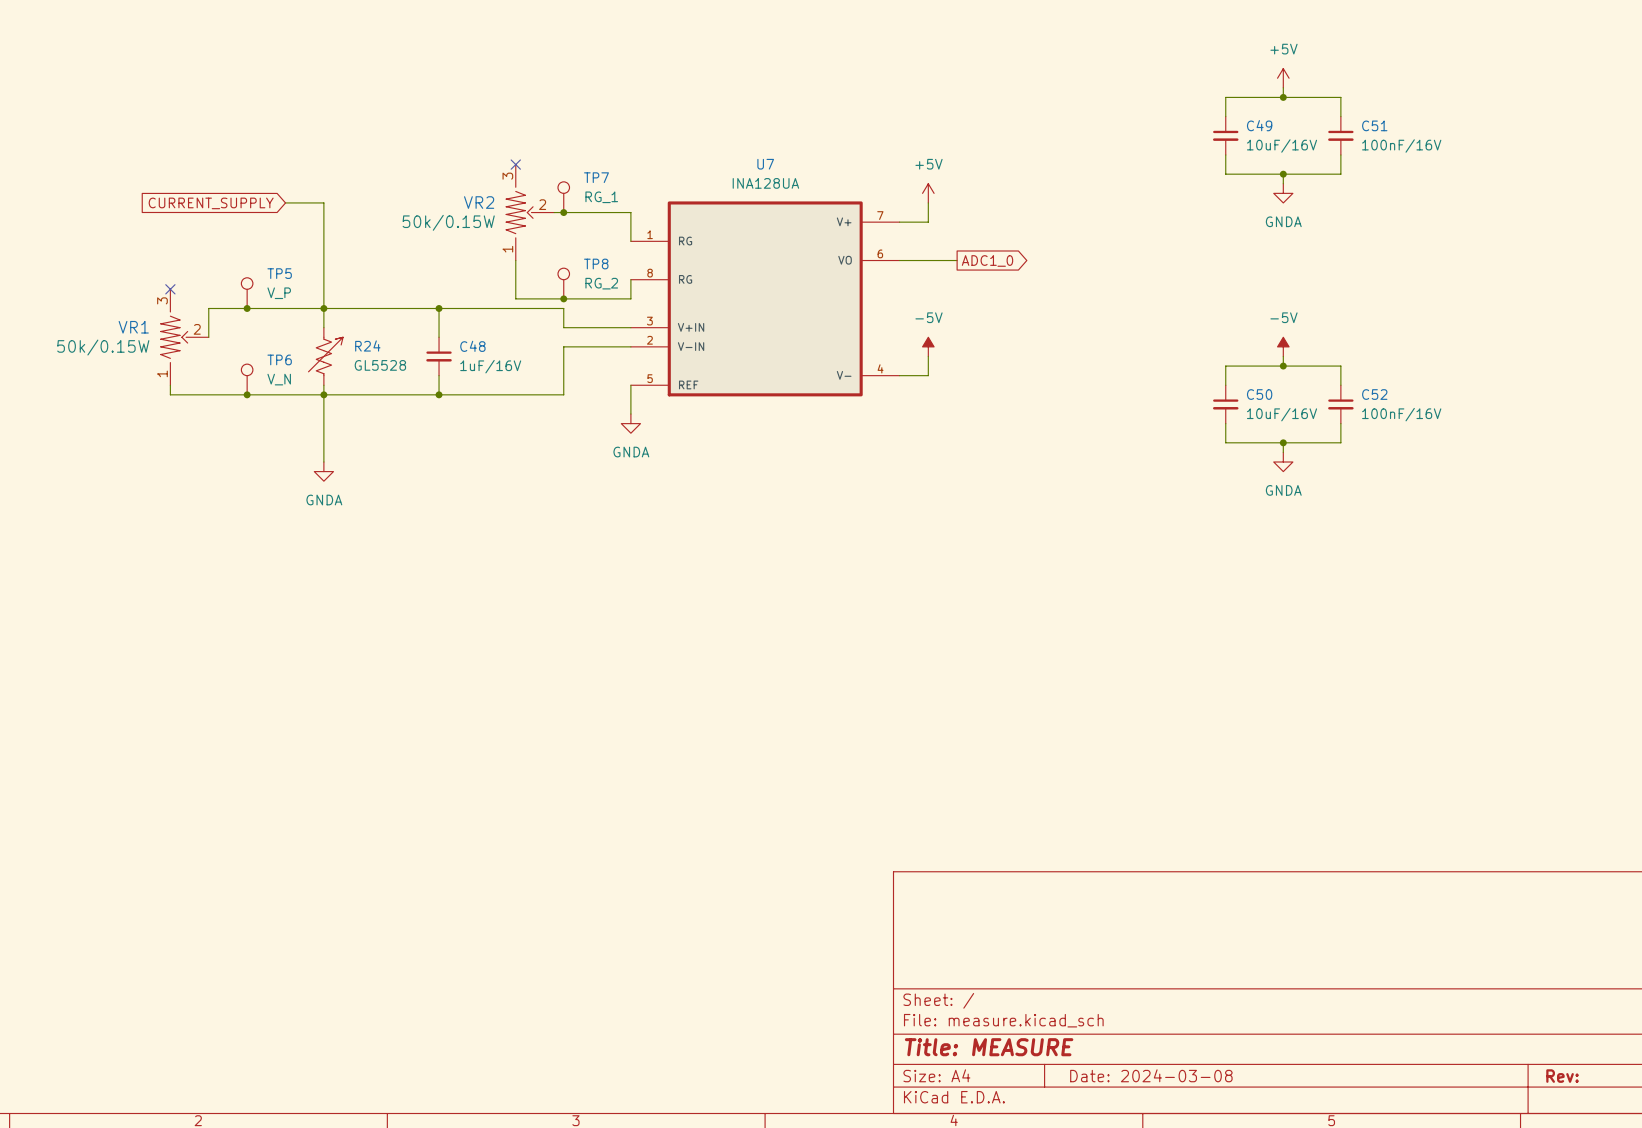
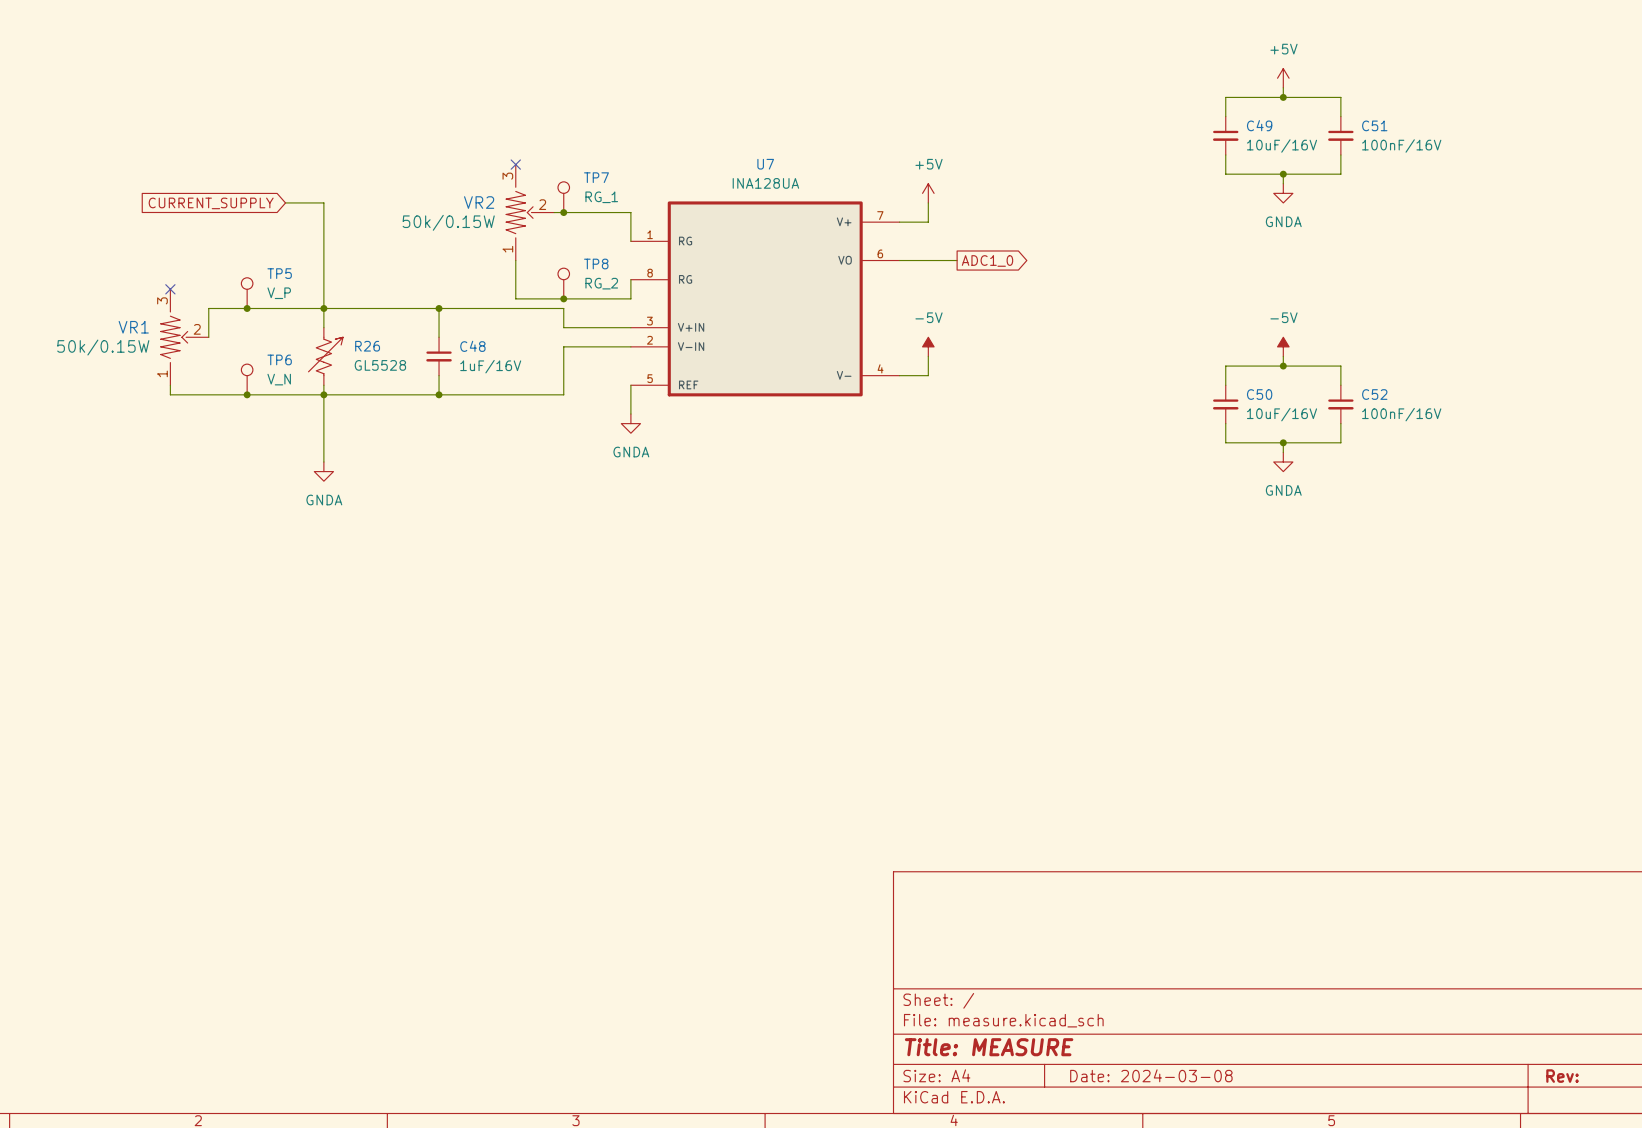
R24 name: R24 (367, 345) -> R26 (367, 346)

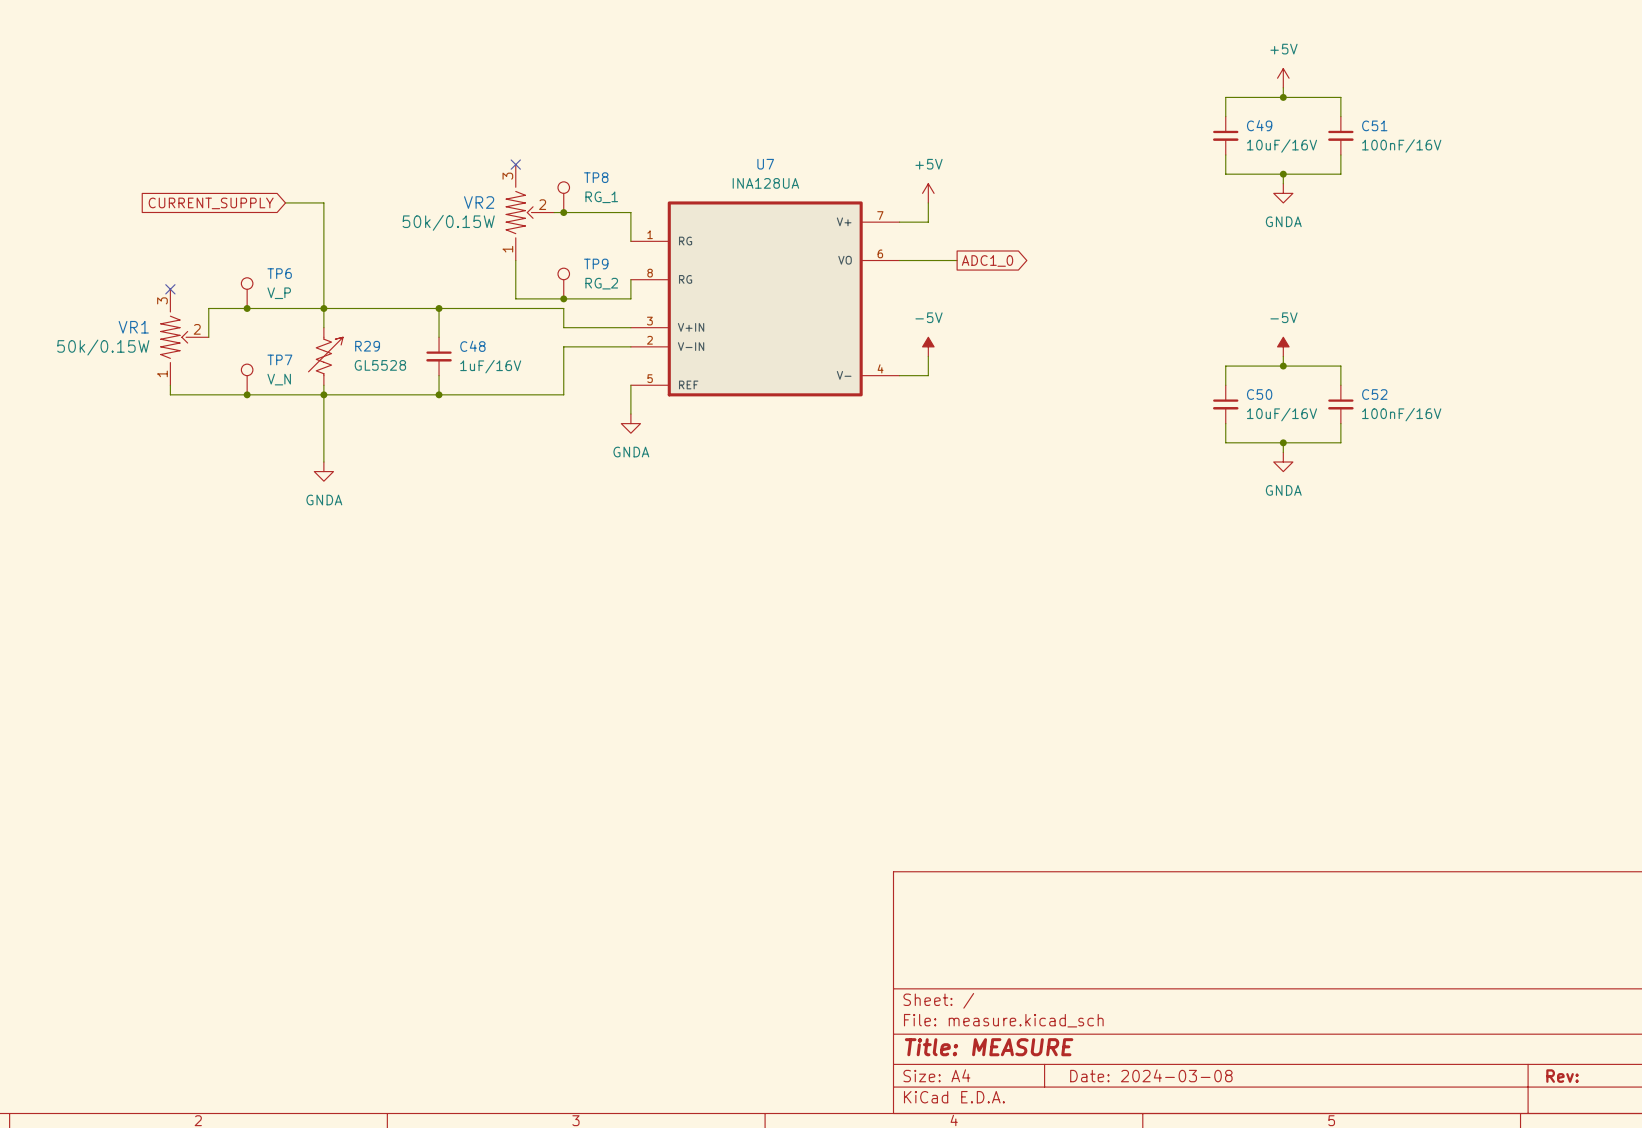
TP7 name: TP7 (596, 177) -> TP8 (596, 177)
TP8 name: TP8 (596, 264) -> TP9 (596, 264)
TP5 name: TP5 (279, 273) -> TP6 (279, 273)
R26 name: R26 (367, 346) -> R29 (367, 346)
TP6 name: TP6 (279, 359) -> TP7 (279, 359)

